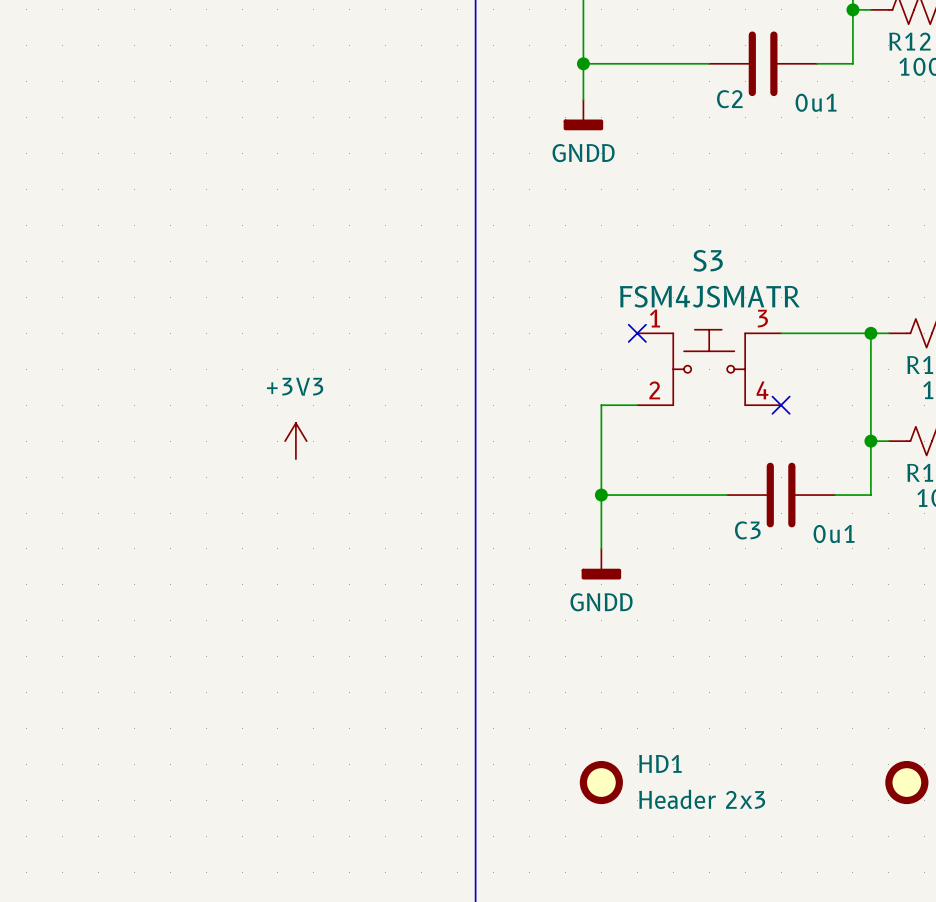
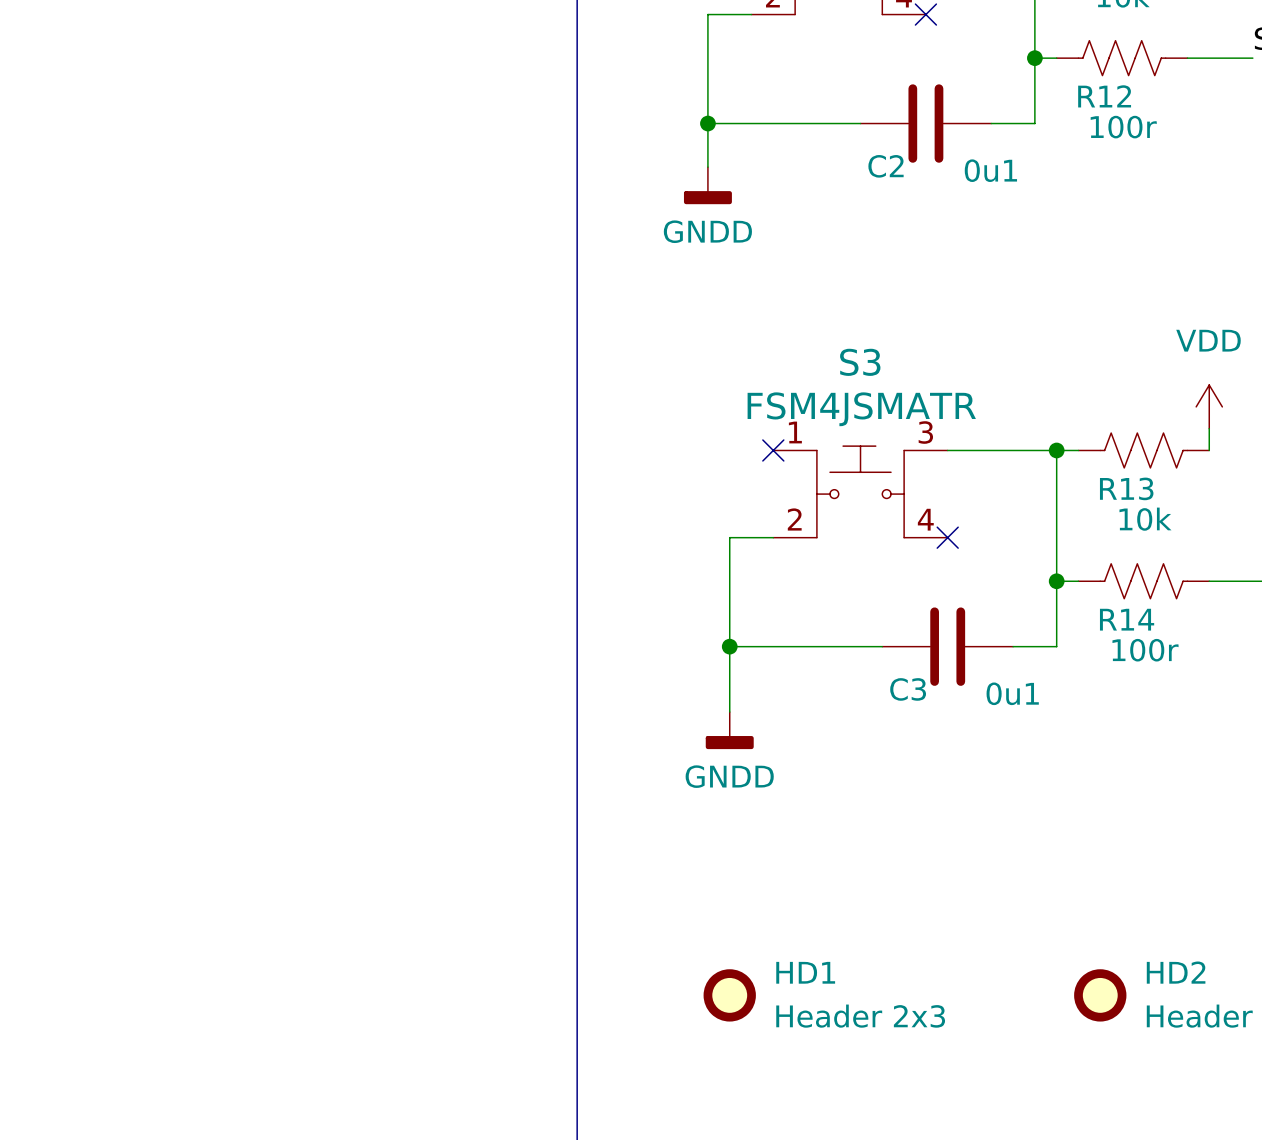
power symbol: +3V3 (295, 441) -> none

